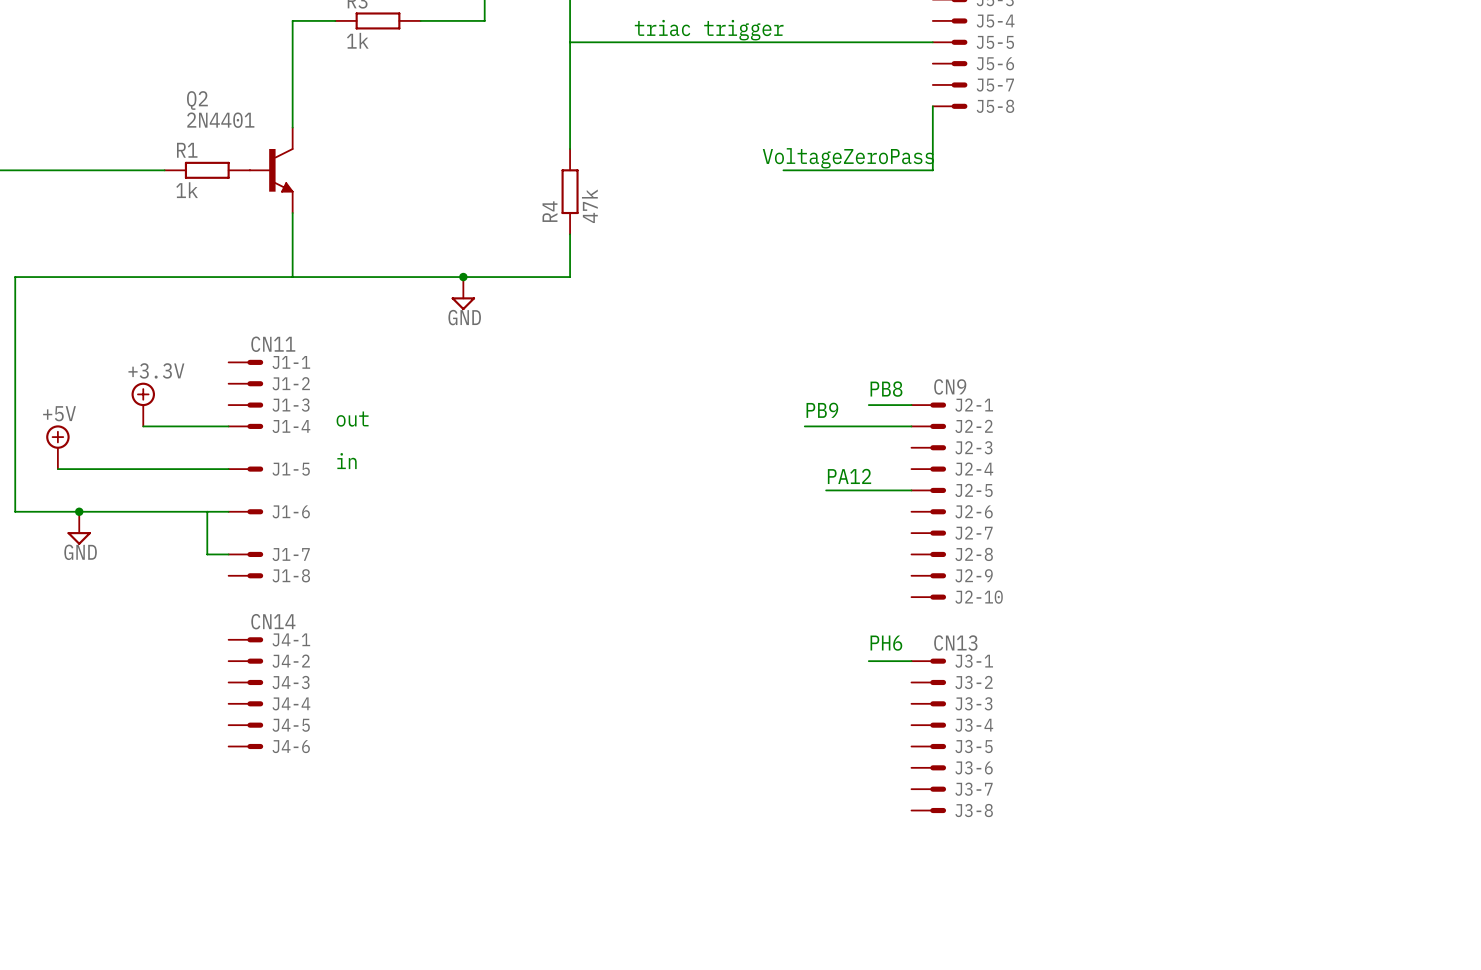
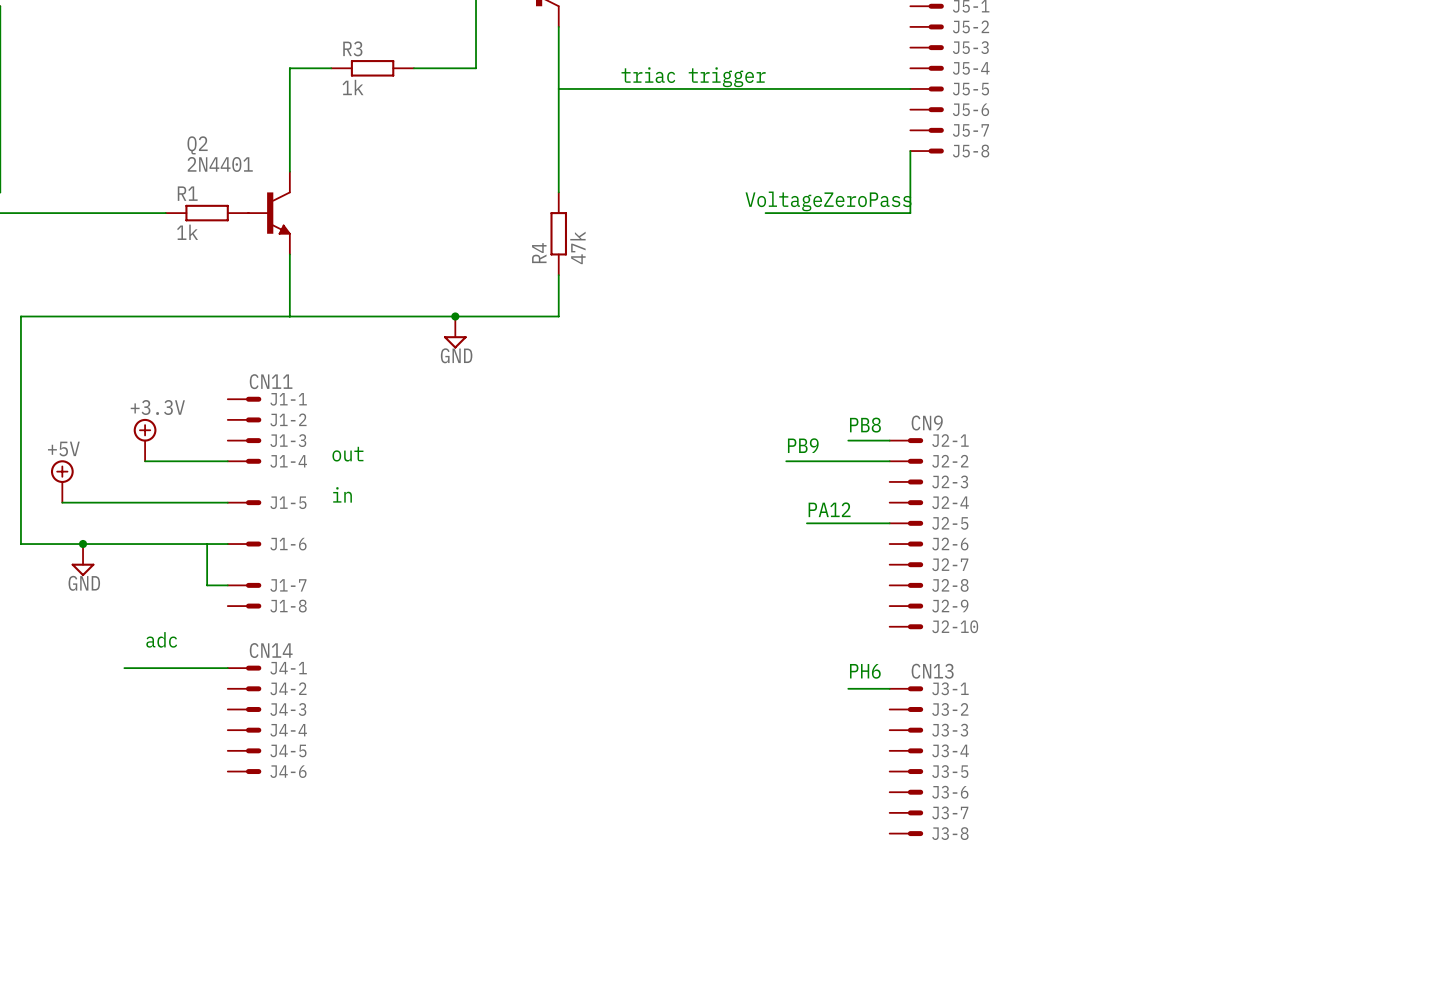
text: none -> adc (161, 639)
wire: none -> (124, 668) (227, 668)

